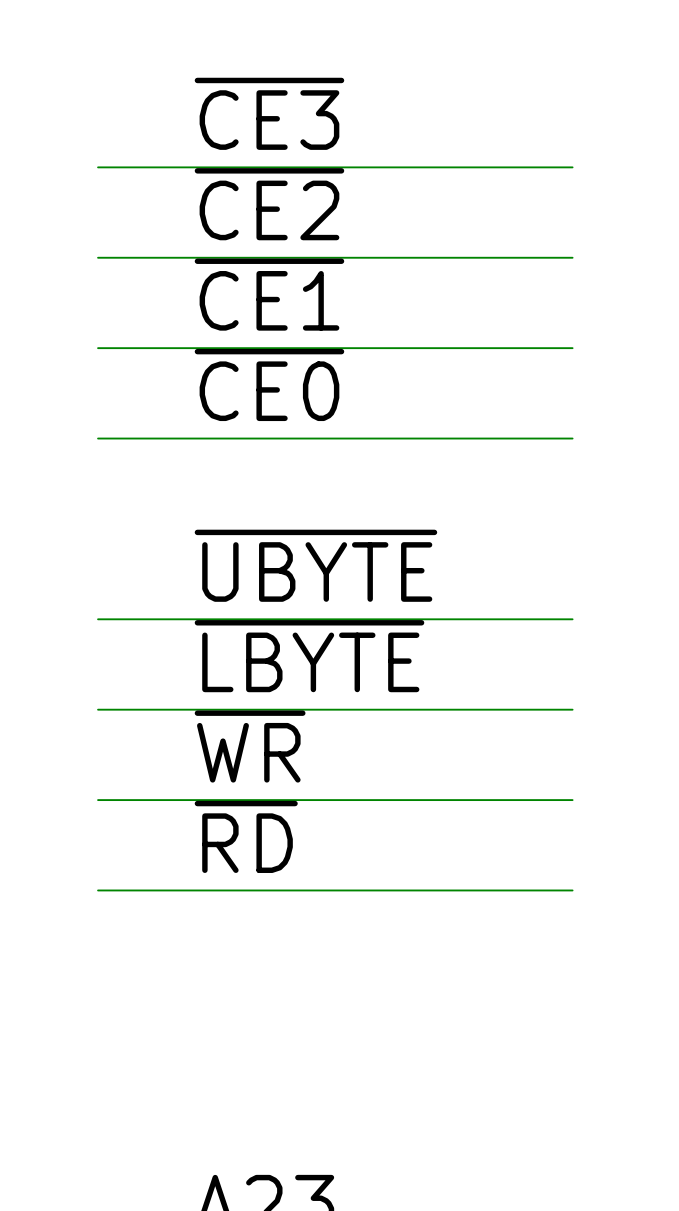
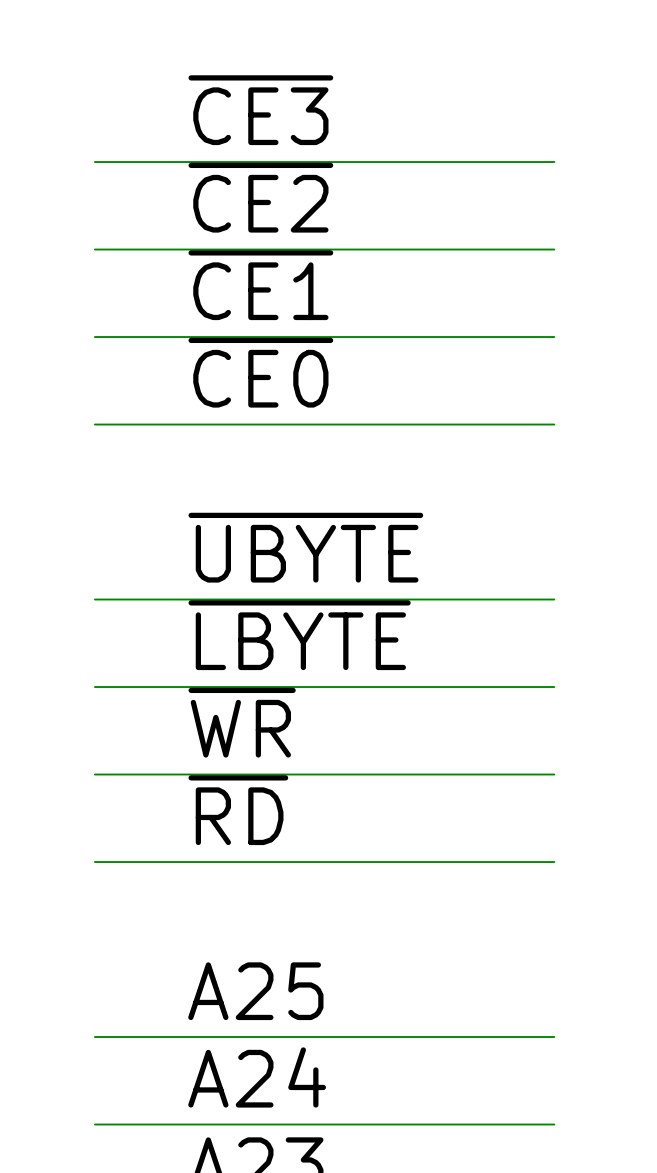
label: none -> A25 (255, 991)
wire: none -> (94, 1037) (554, 1037)
label: none -> A24 (257, 1077)
wire: none -> (94, 1124) (554, 1124)

